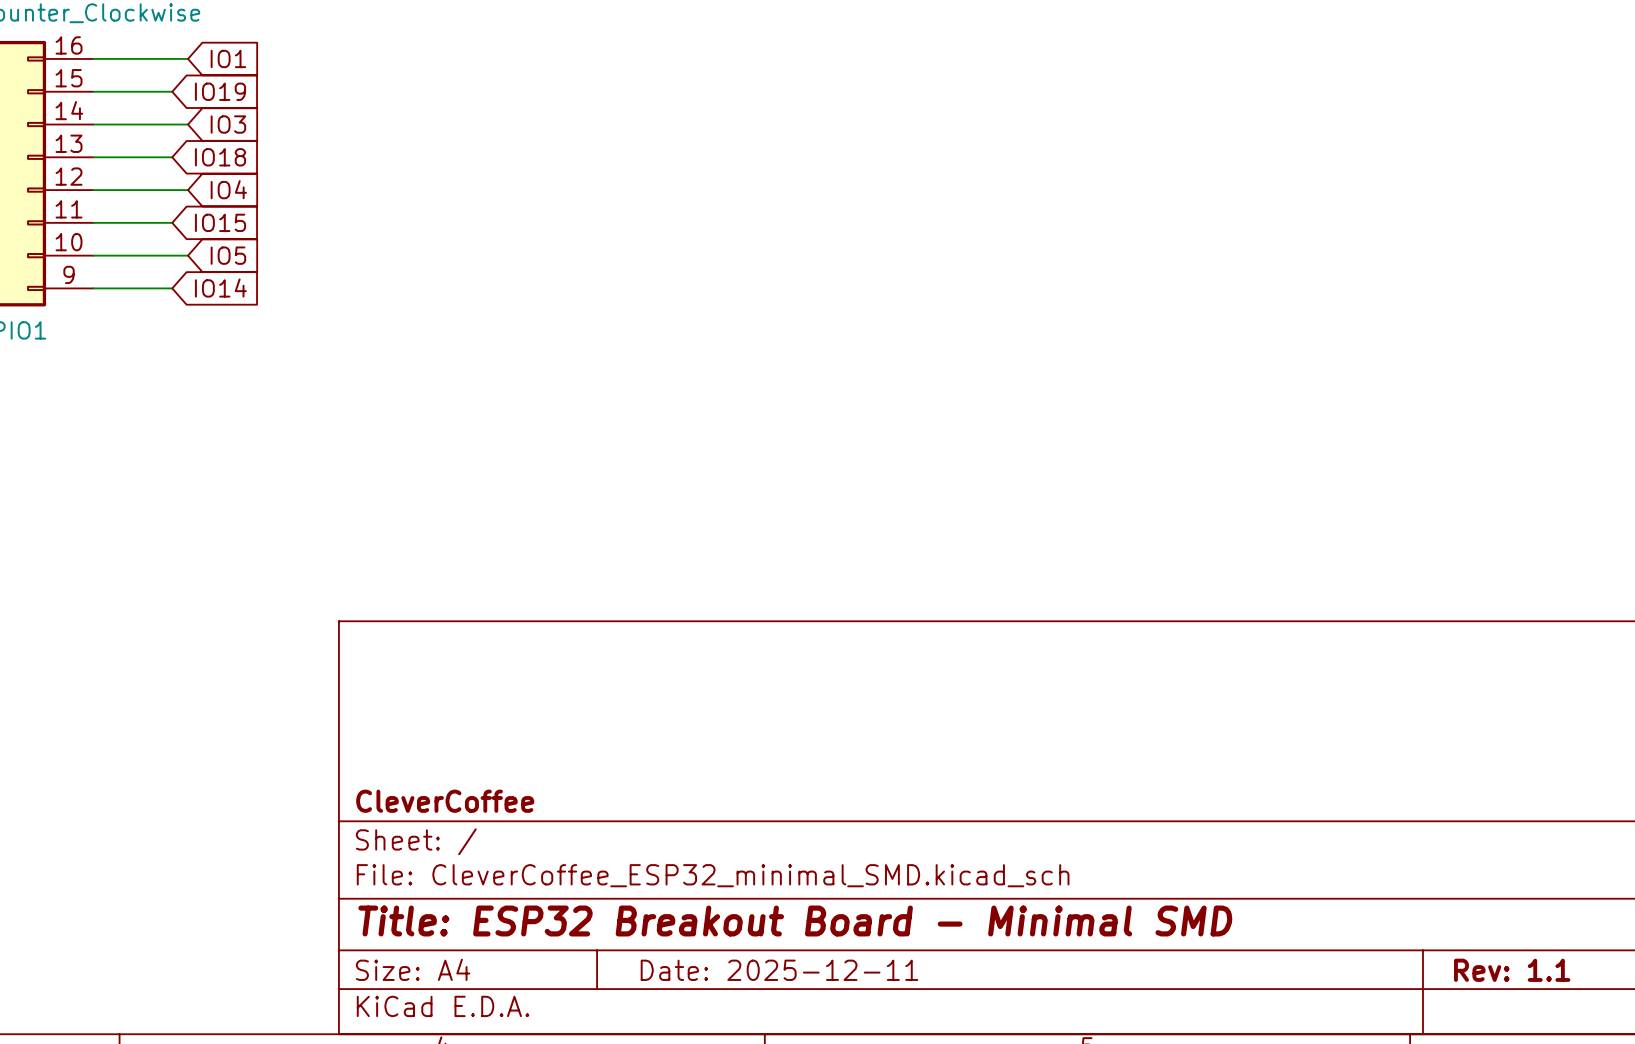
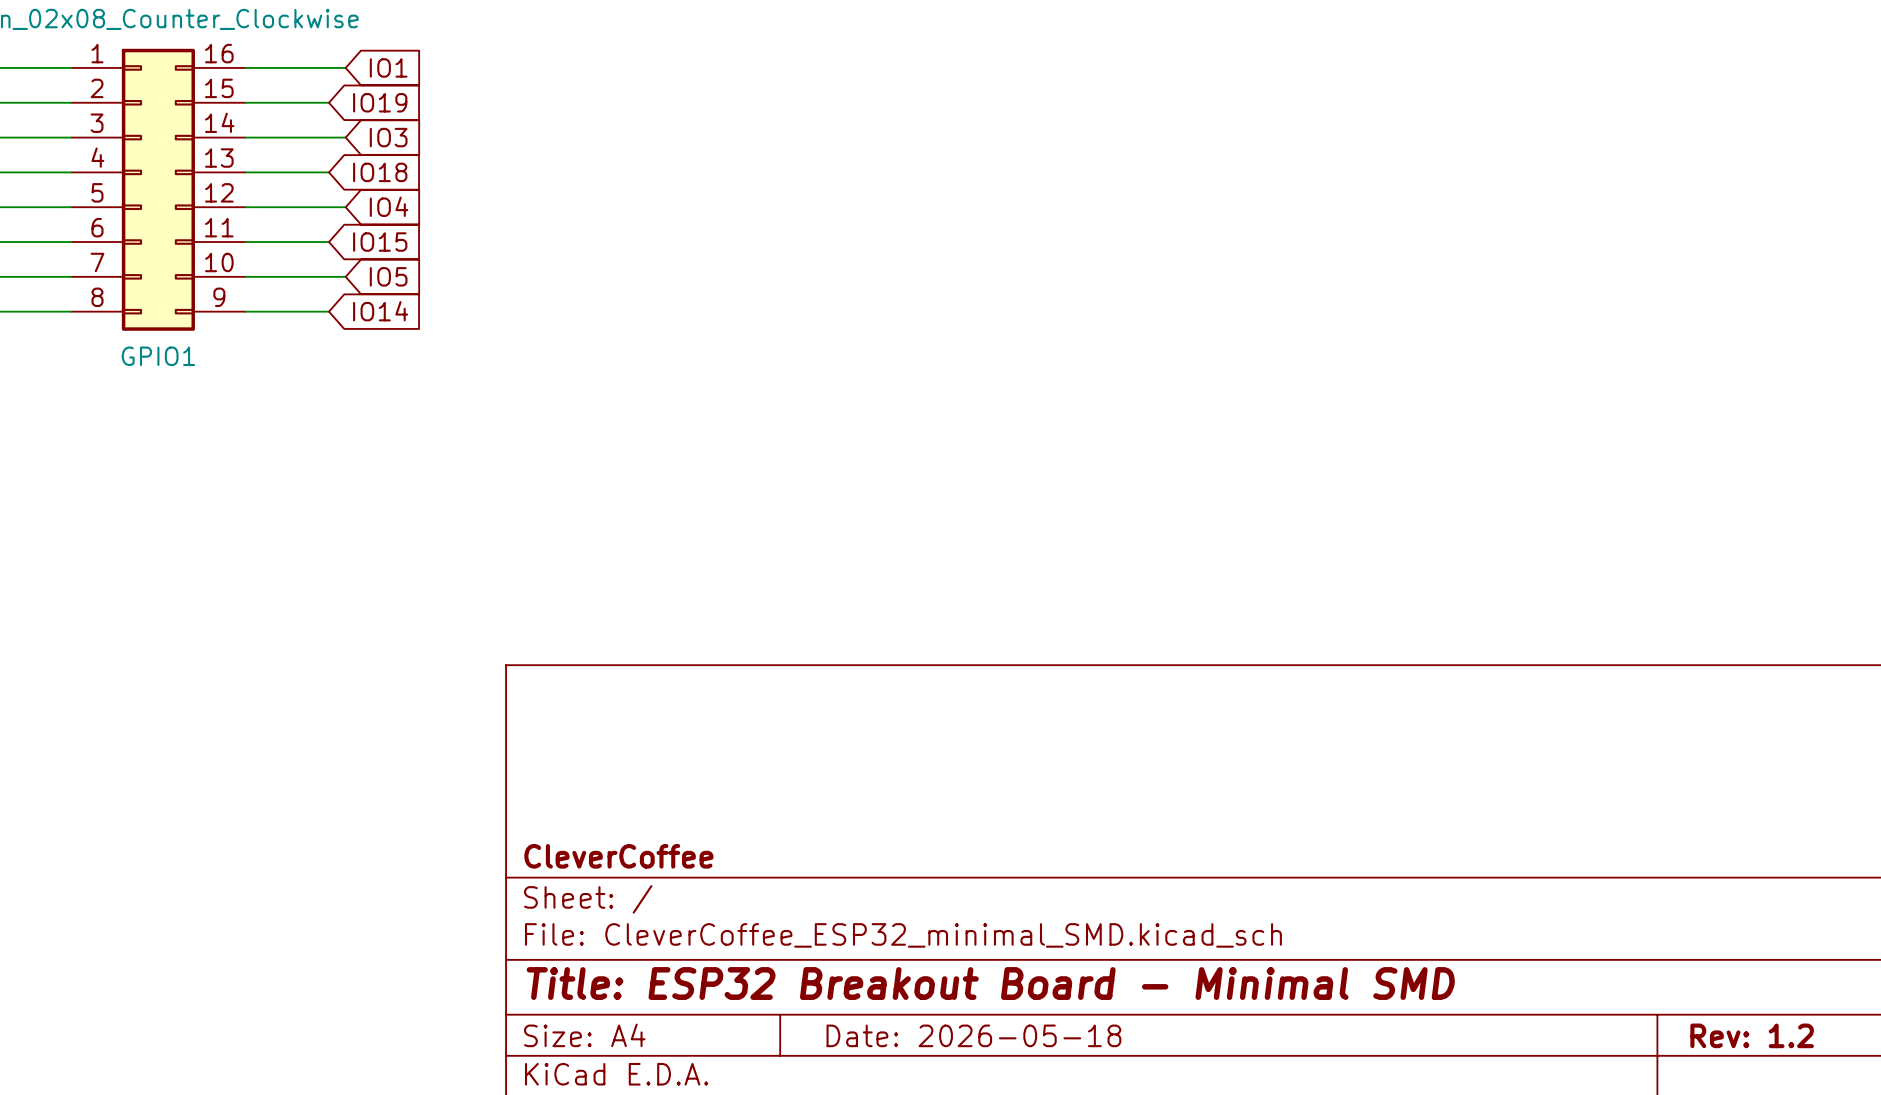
title block: Date: 2025-12-11 (779, 970) -> Date: 2026-05-18 (973, 1035)
title block: Rev: 1.1 (1512, 970) -> Rev: 1.2 (1752, 1035)

